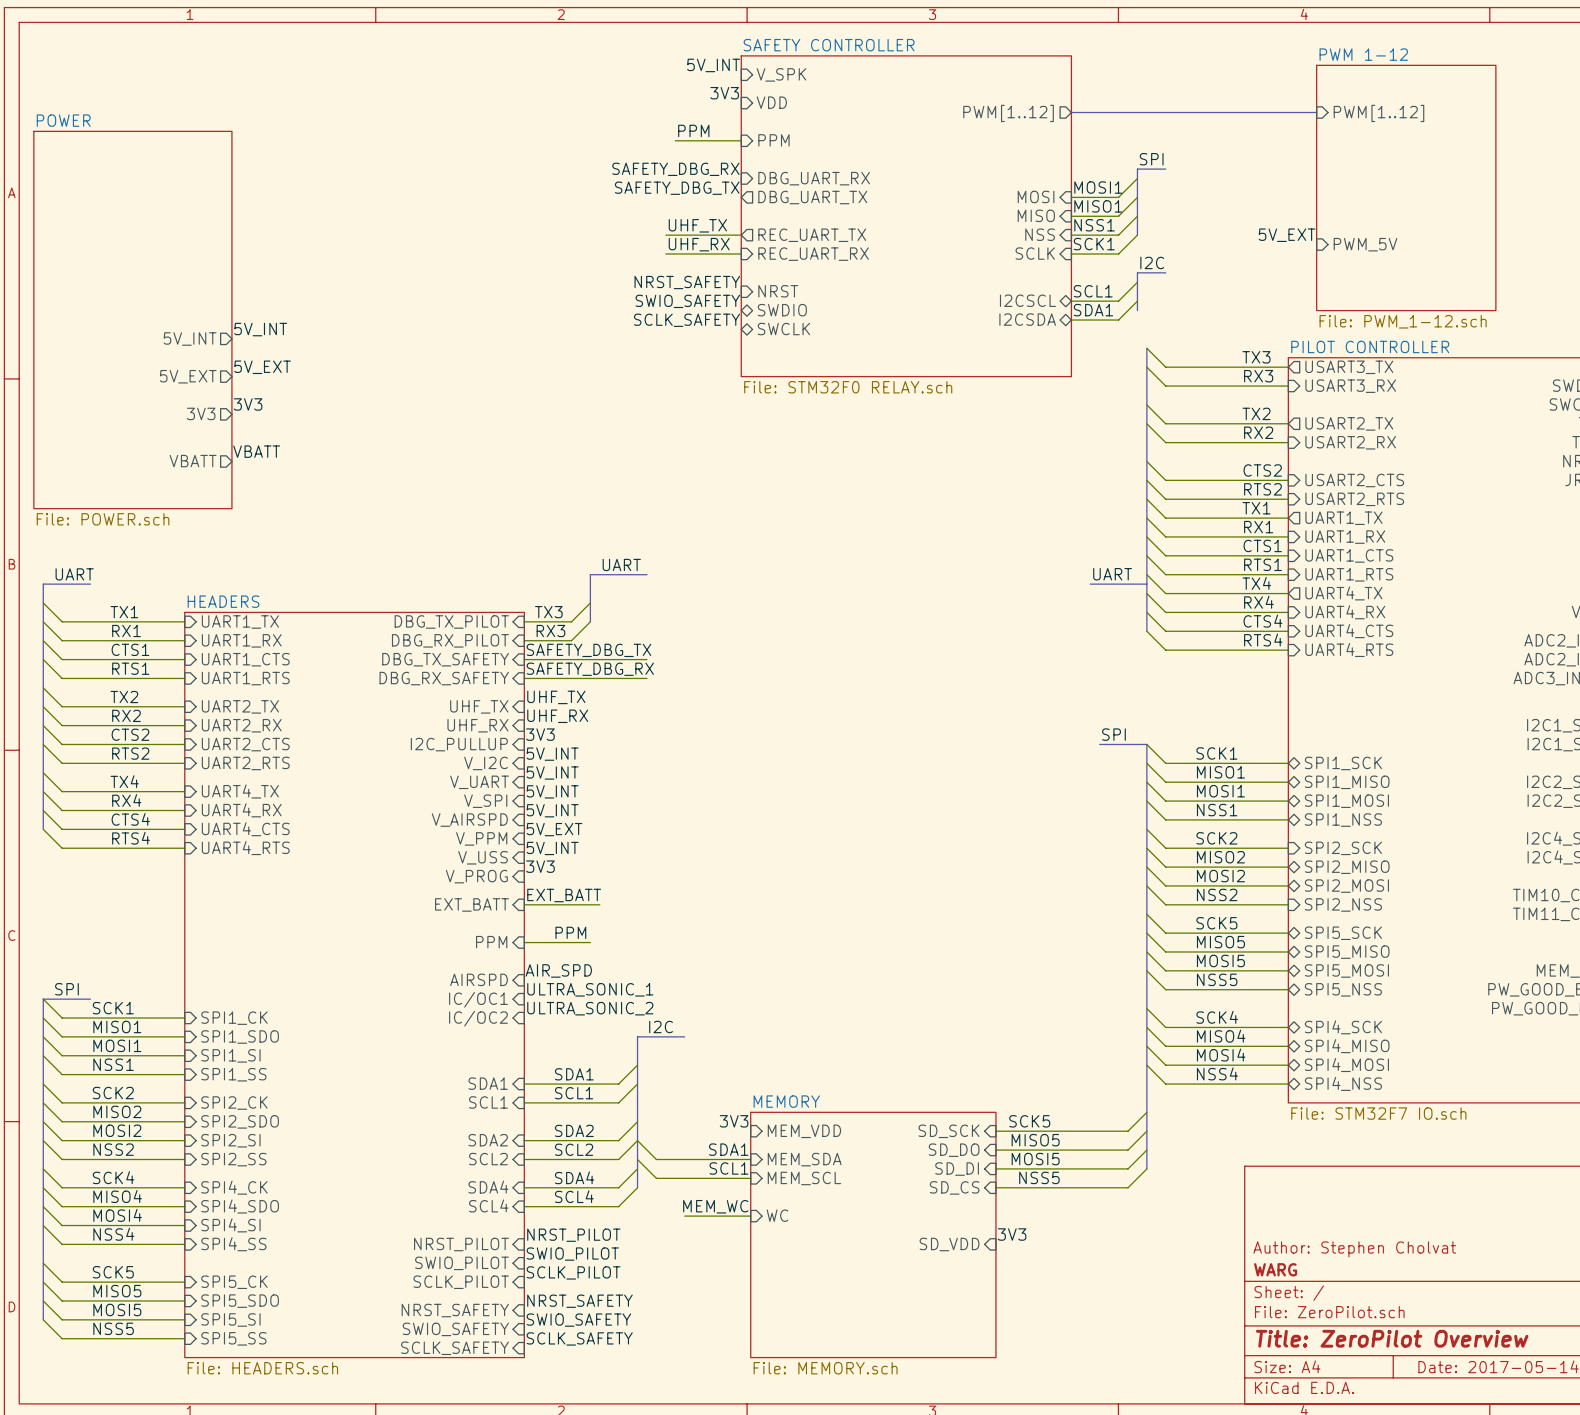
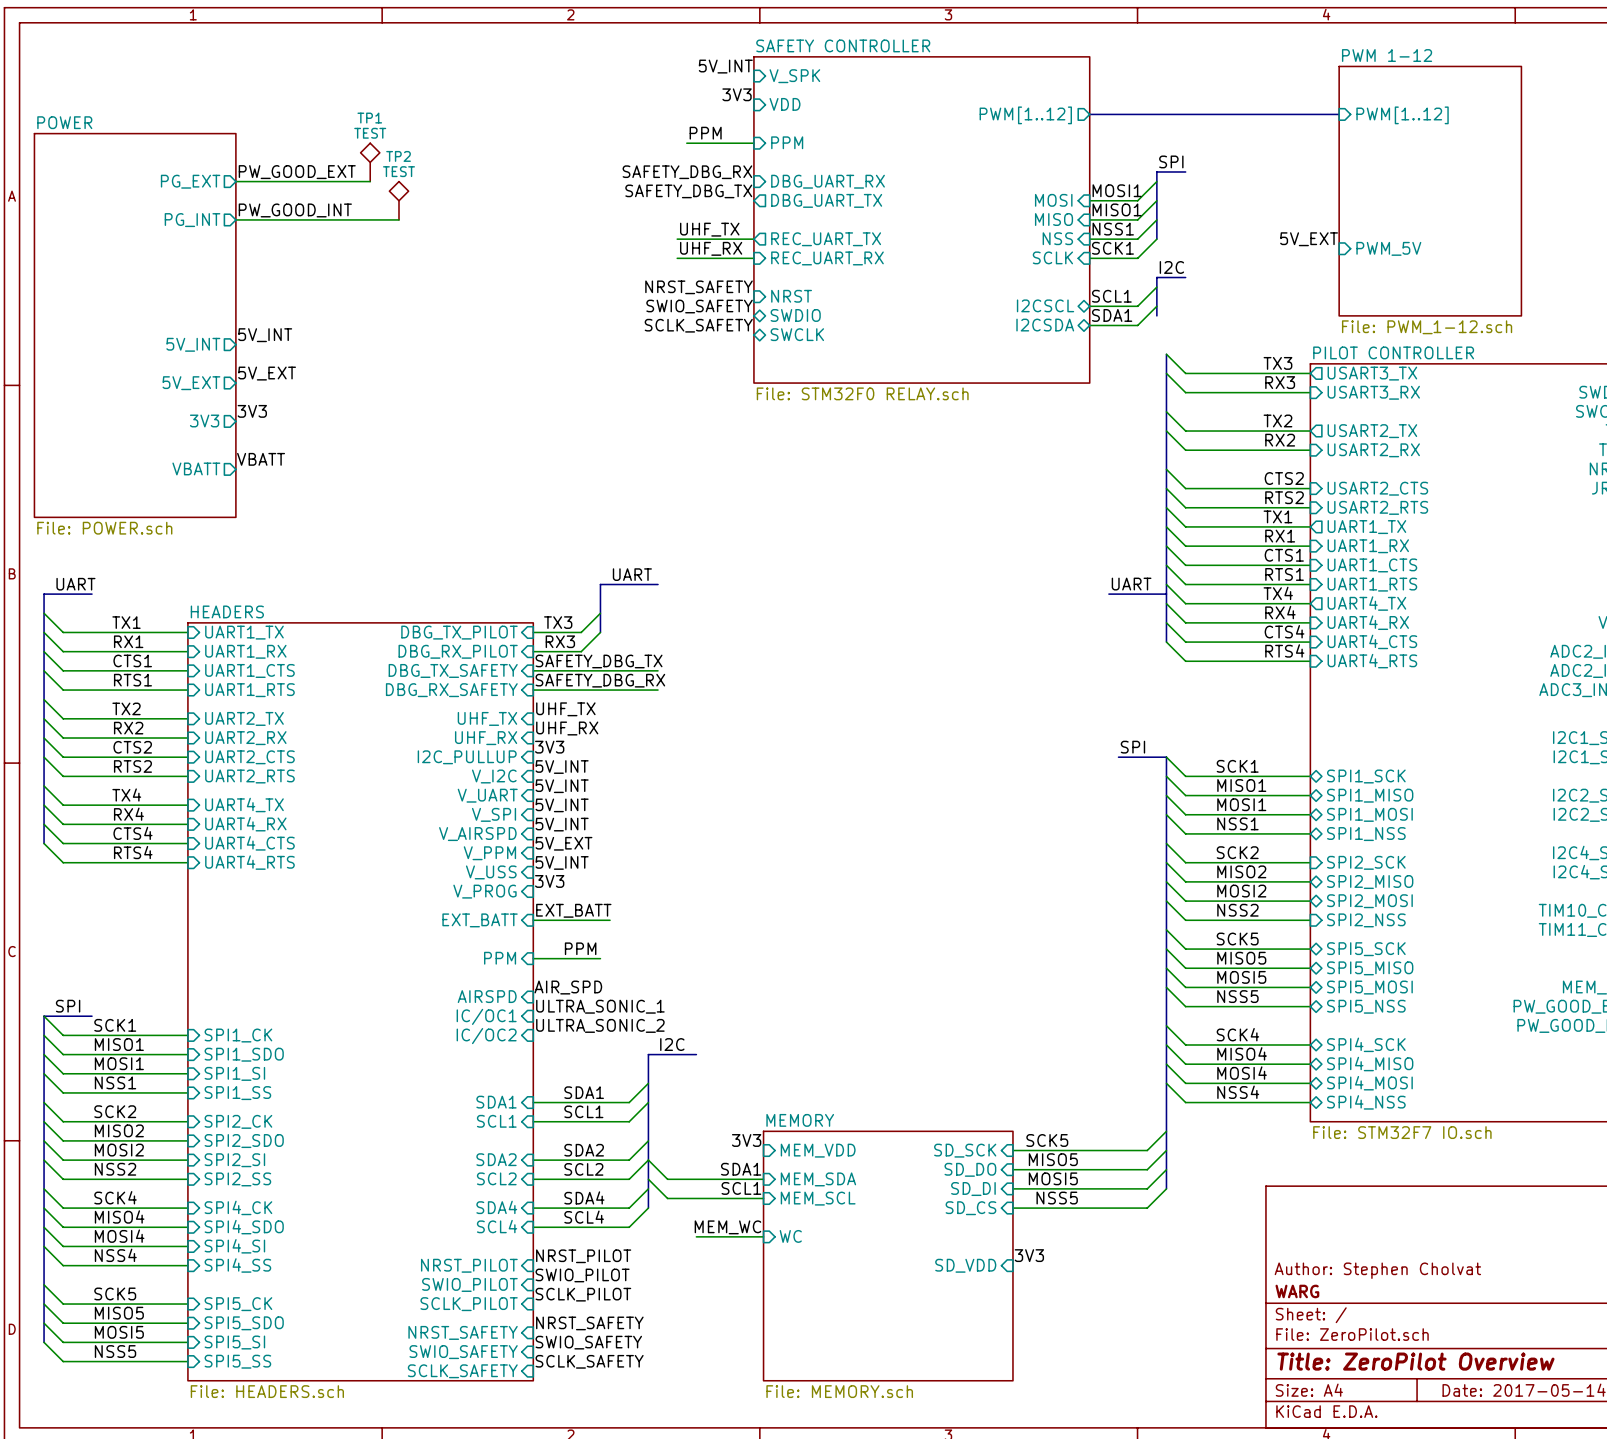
TP1: none -> TEST (370, 162)
label: none -> PW_GOOD_EXT (297, 172)
sheet pin: none -> PG_EXT (190, 181)
wire: none -> (235, 181) (370, 181)
TP2: none -> TEST (398, 200)
label: none -> PW_GOOD_INT (295, 210)
sheet pin: none -> PG_INT (192, 220)
wire: none -> (235, 219) (398, 219)

